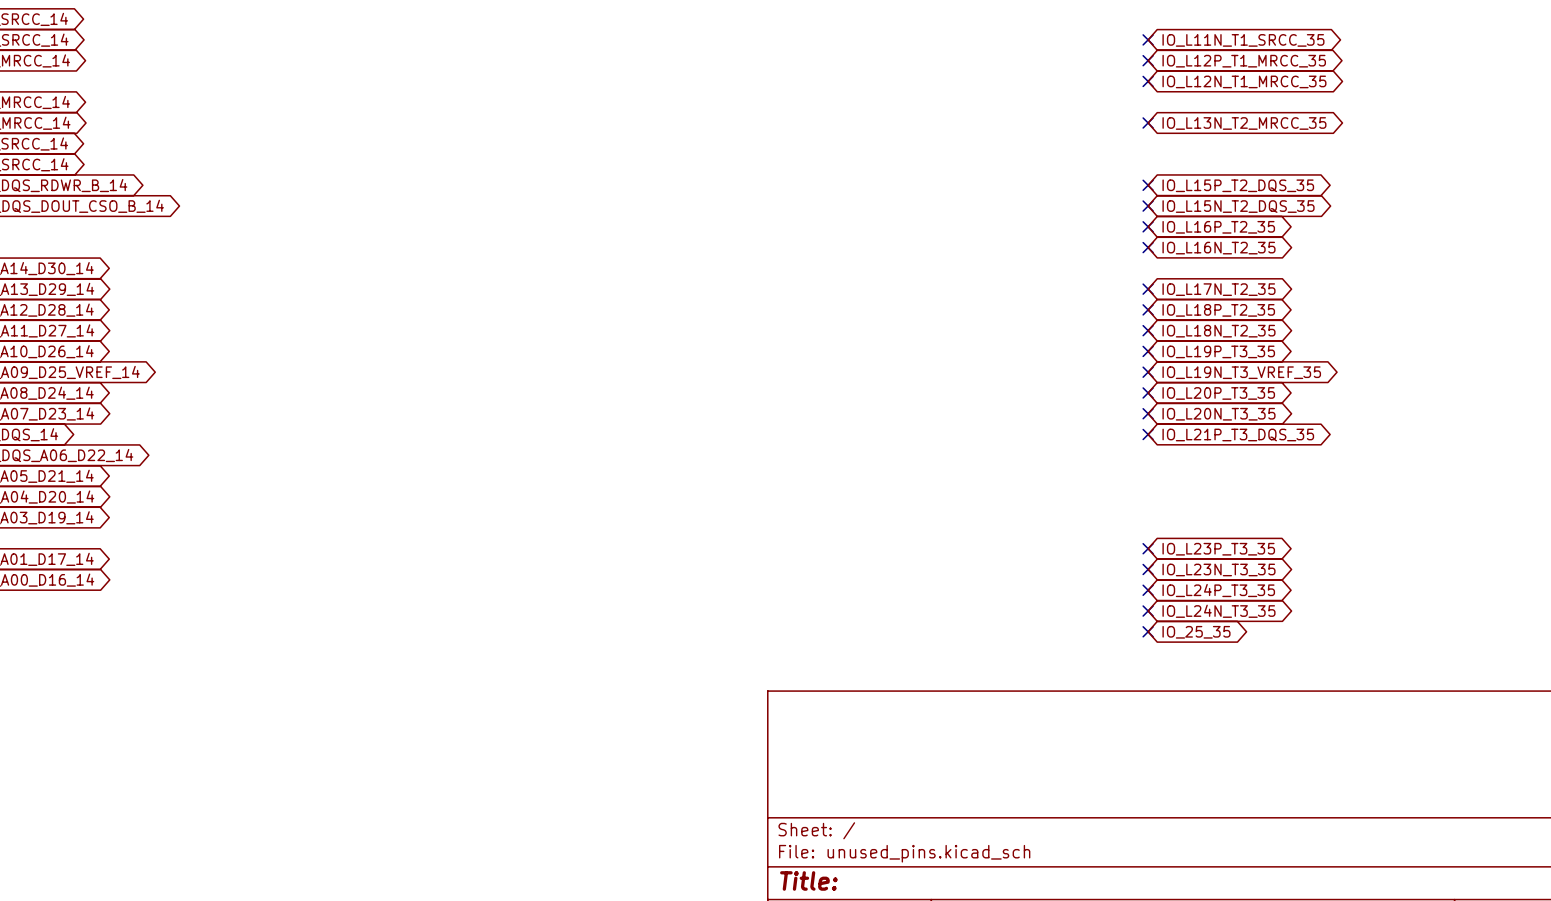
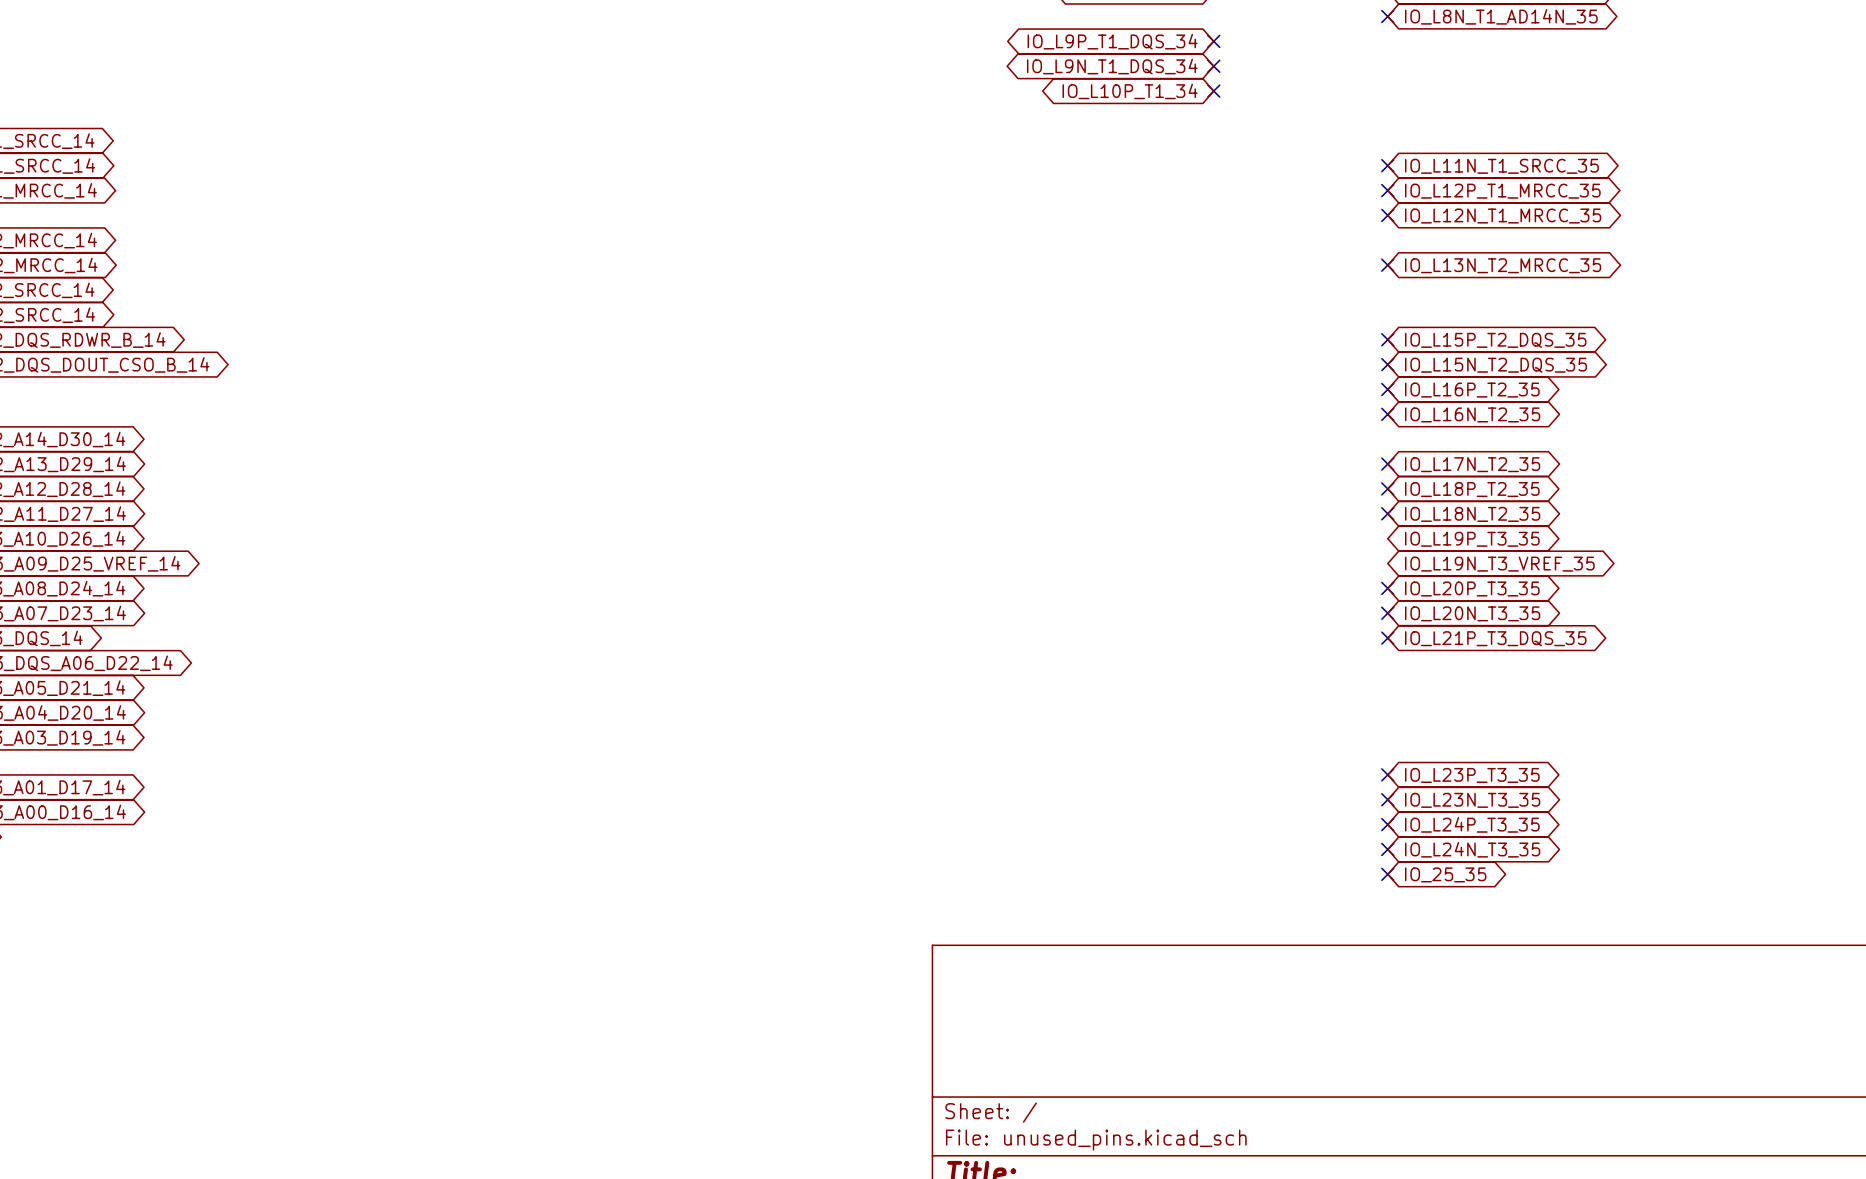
no-connect mark: (1148, 351) -> none
no-connect mark: (1148, 372) -> none

